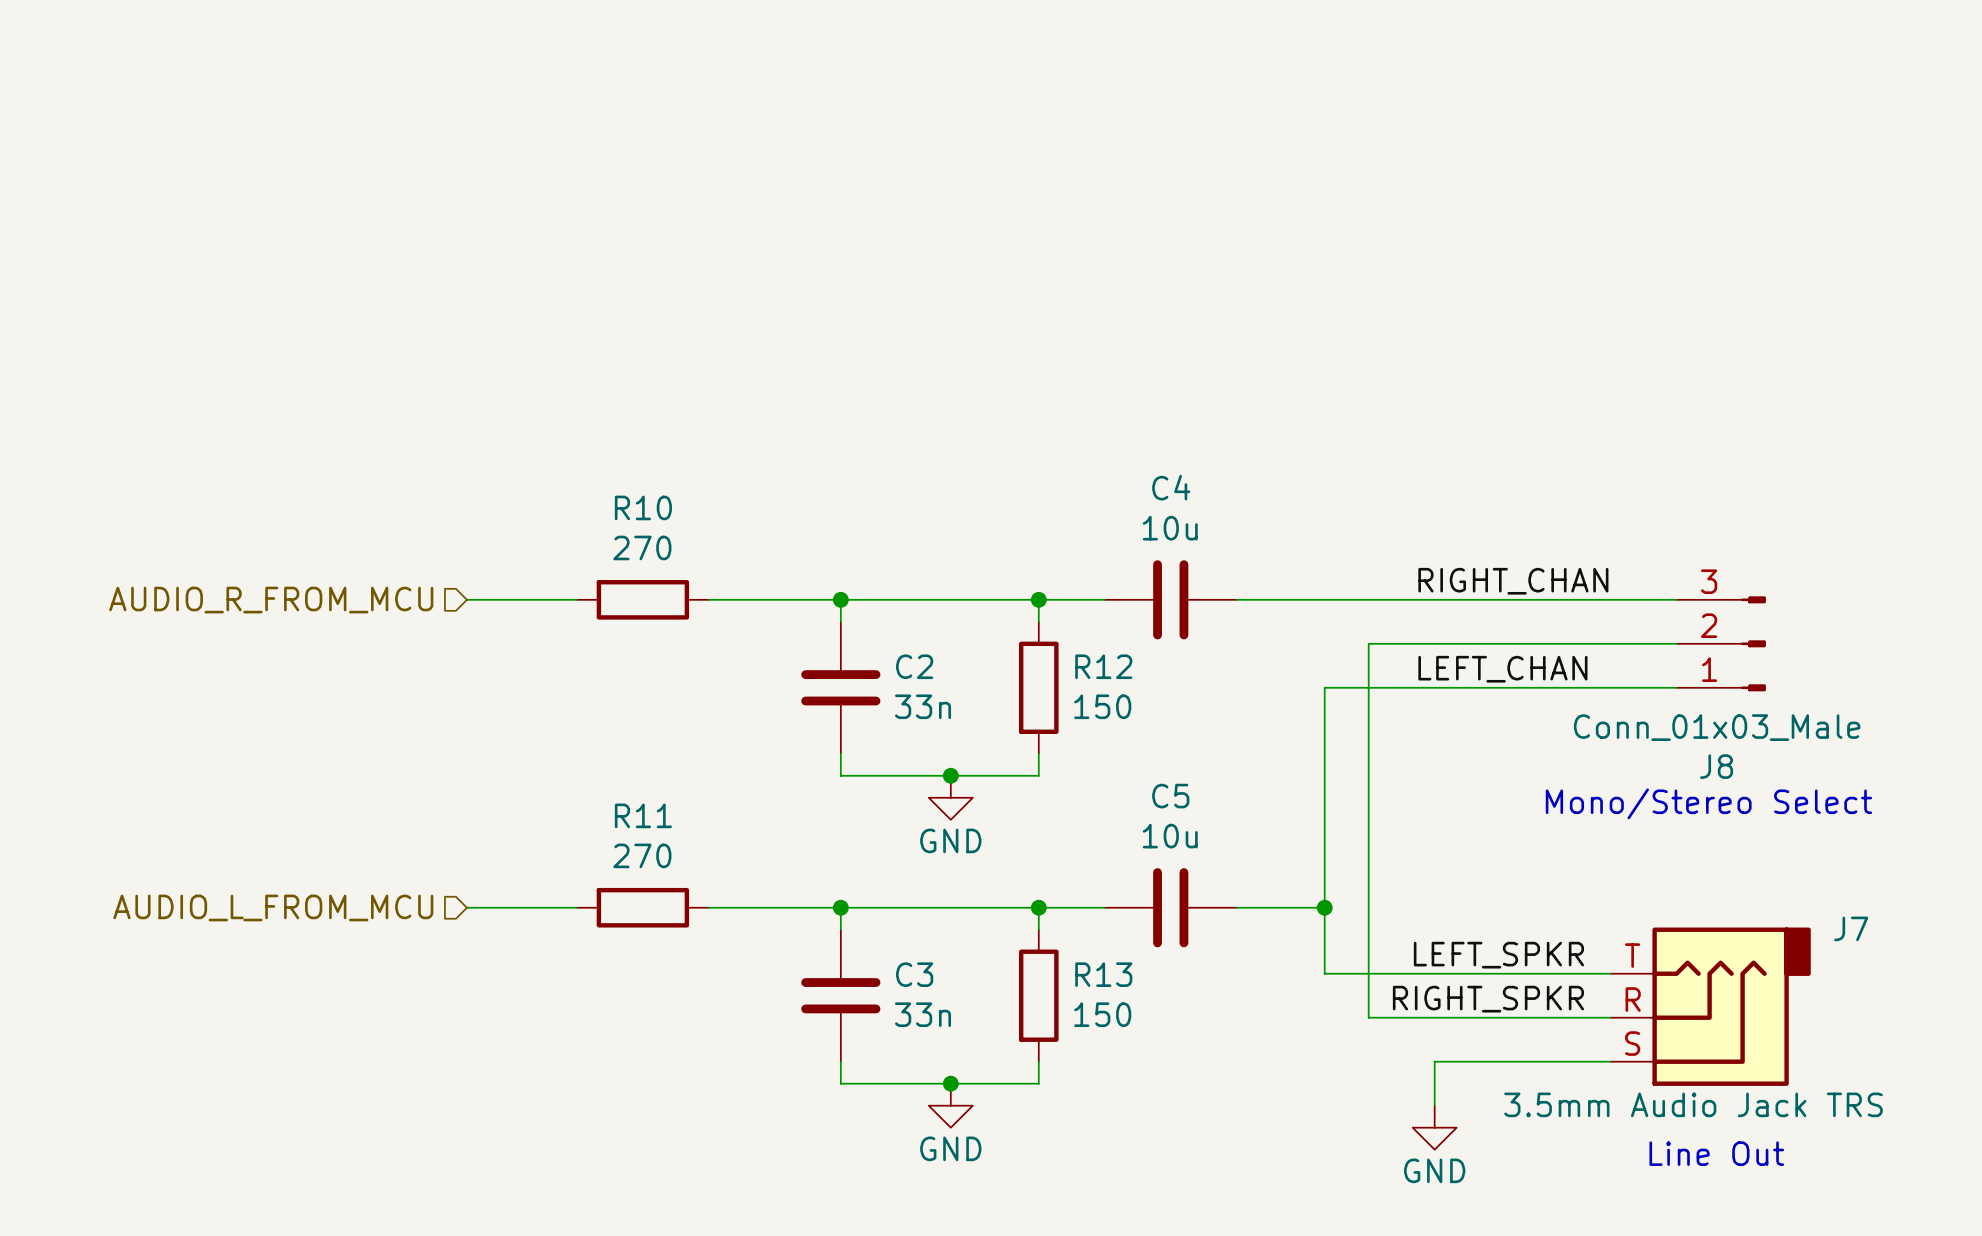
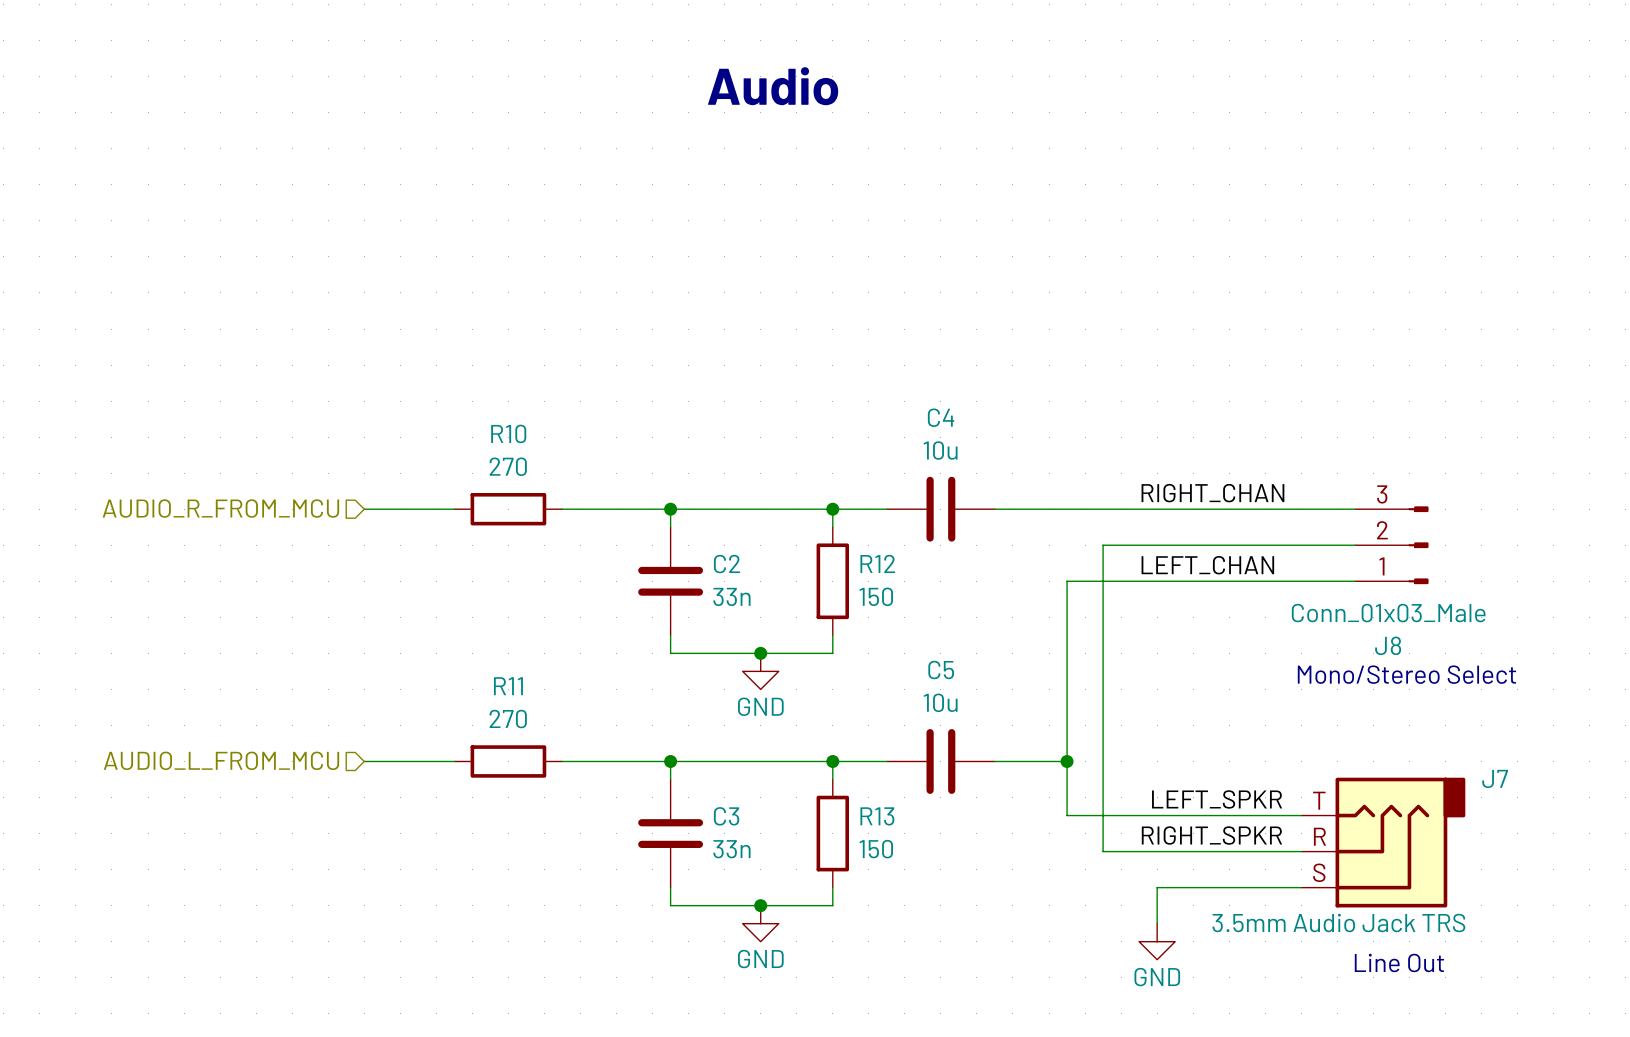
text: none -> Audio (773, 86)

